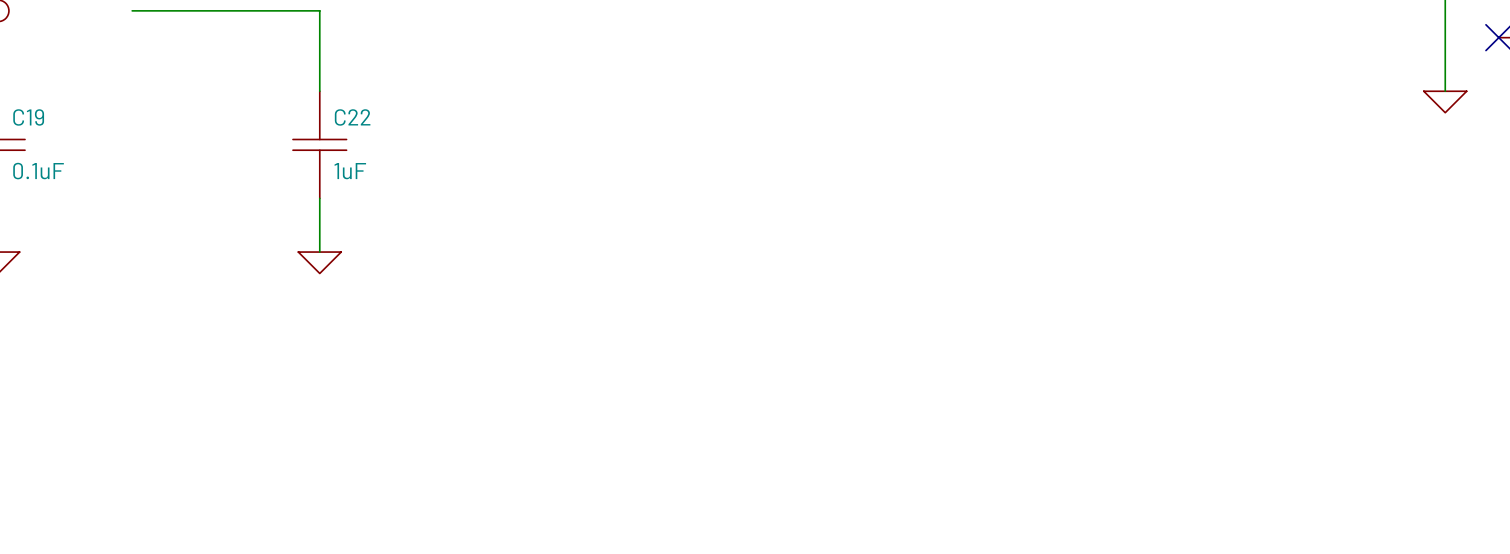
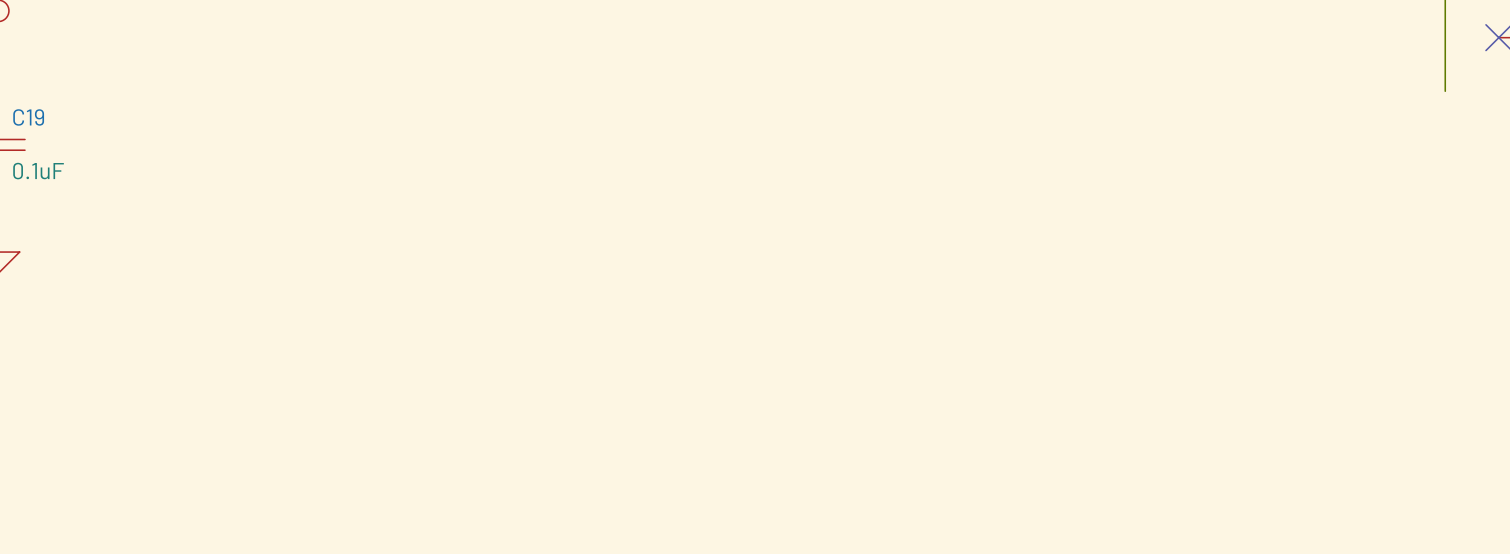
wire: (132, 10) (319, 10) (319, 91) -> none
power symbol: (1445, 101) -> none
C22: 1uF (319, 144) -> none
wire: (319, 198) (319, 252) -> none
power symbol: (319, 262) -> none

